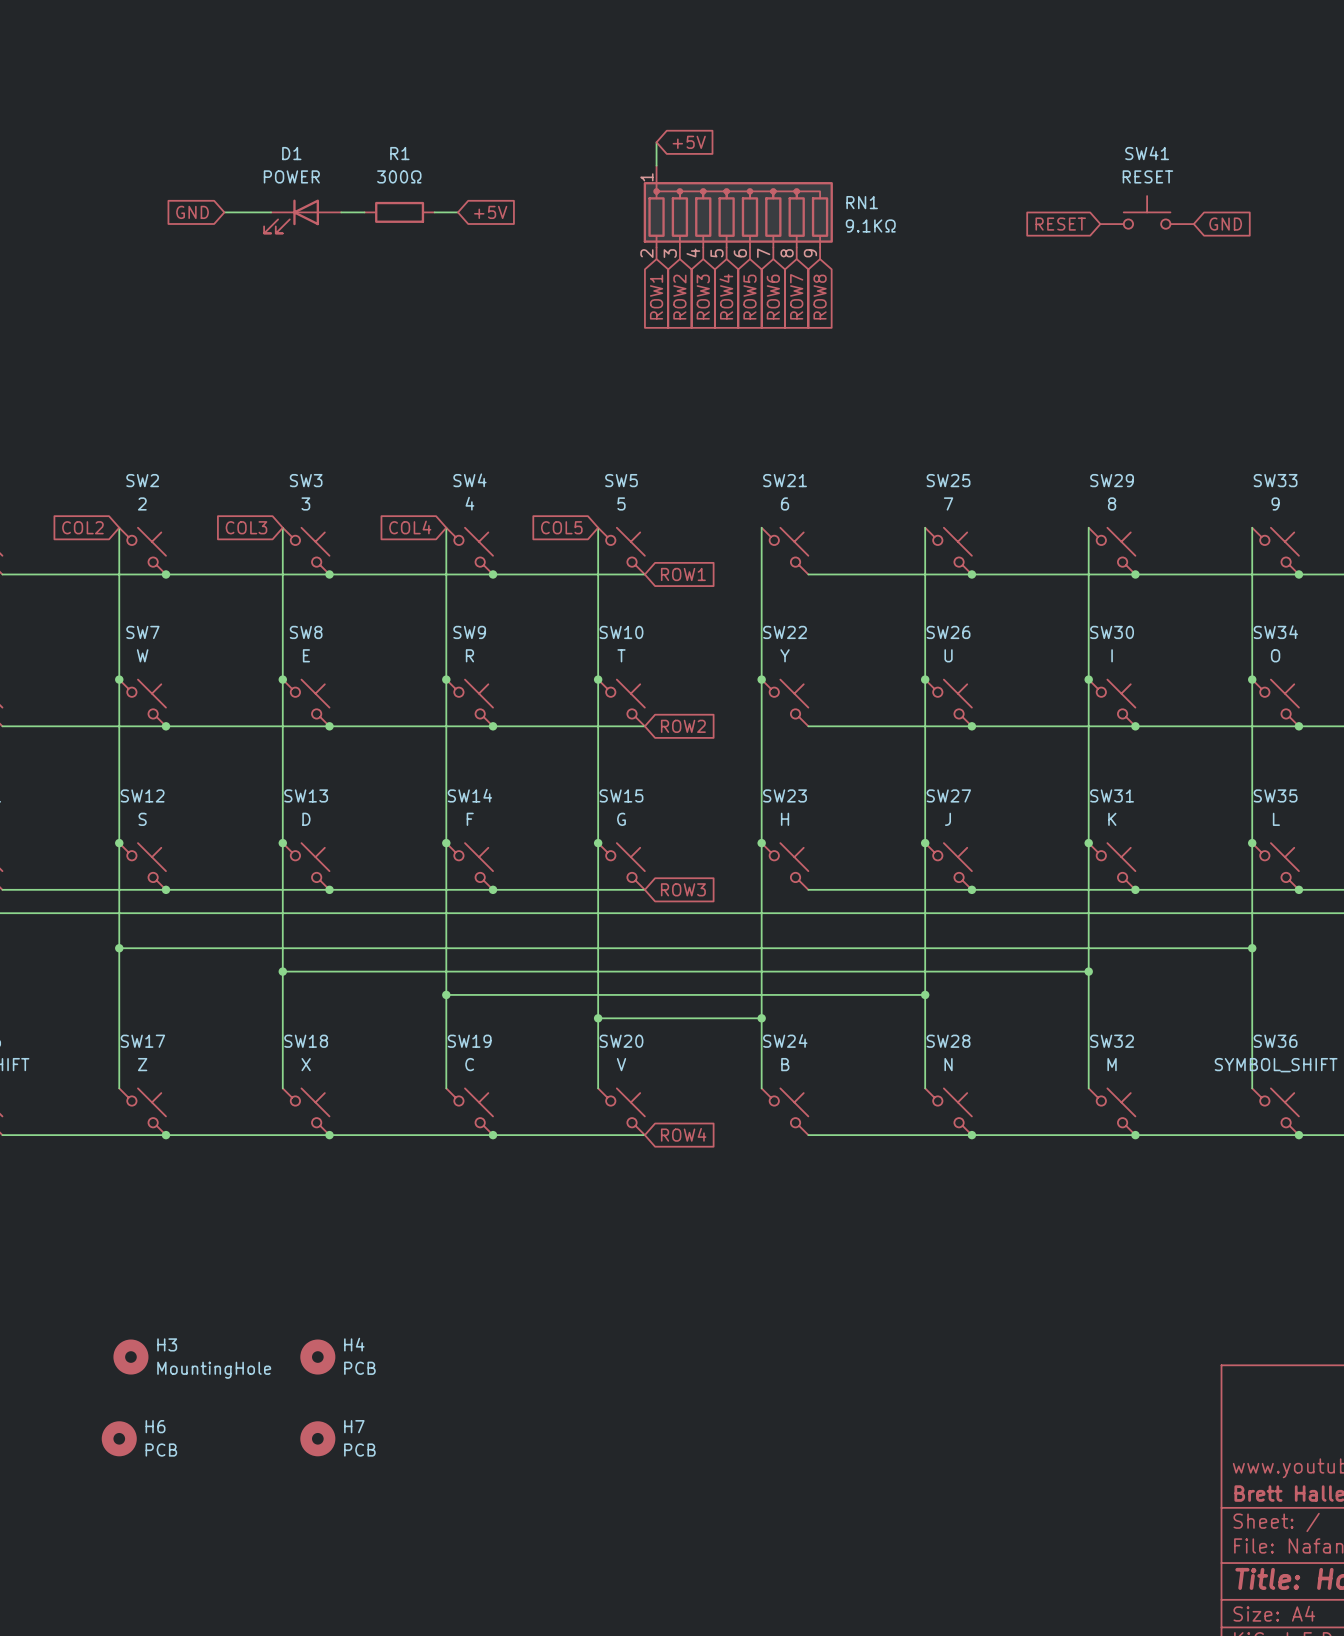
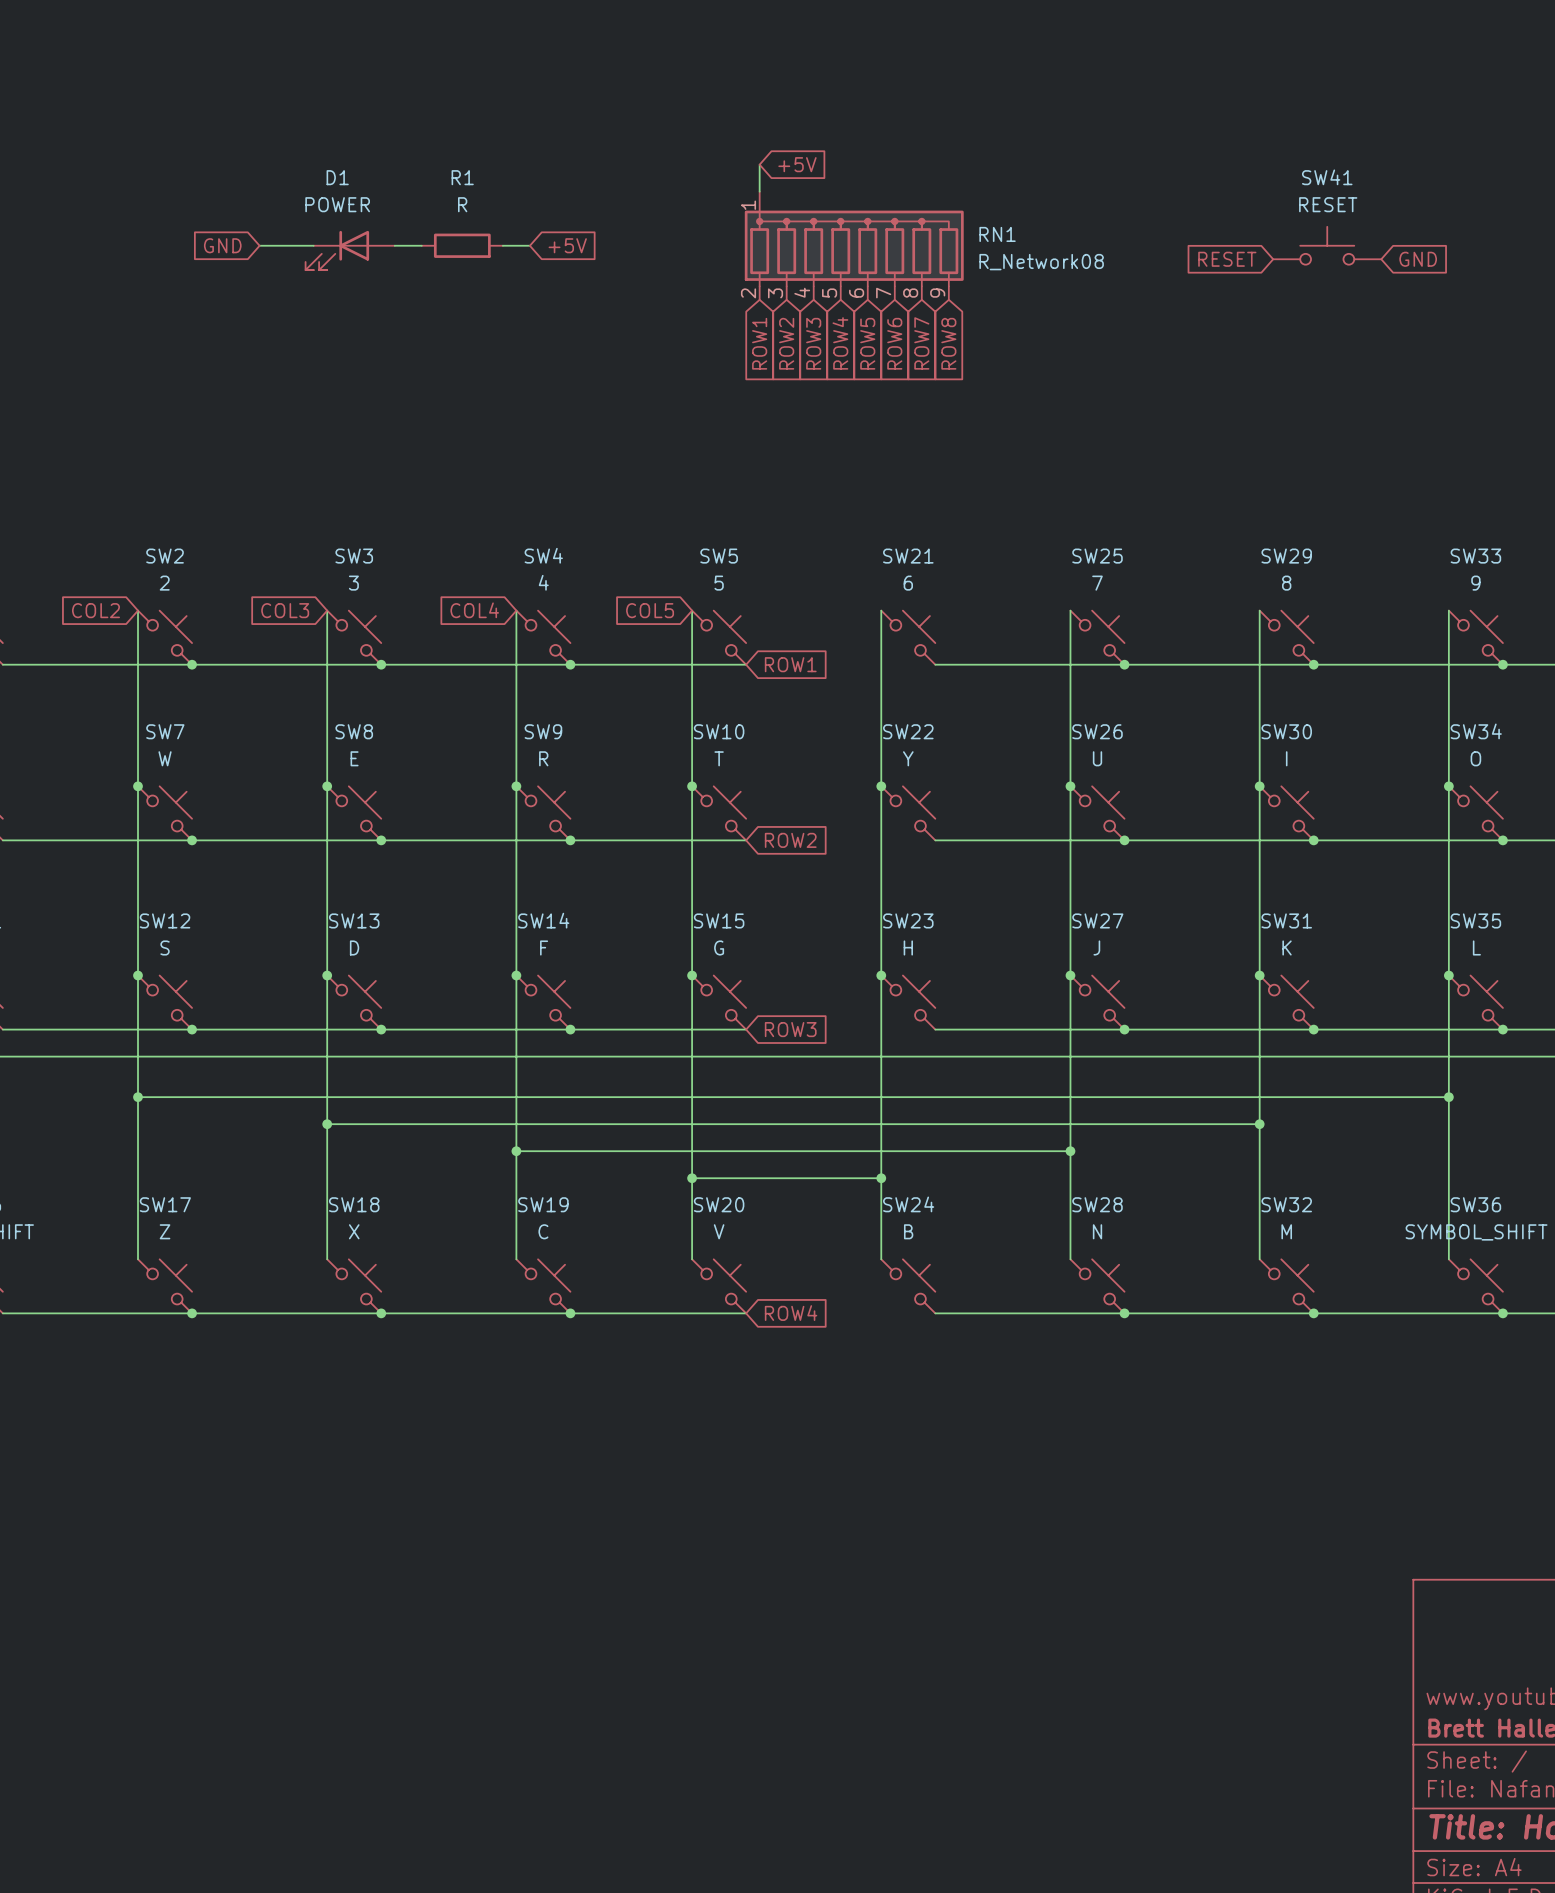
R1 value: 300Ω (399, 176) -> R (462, 204)
RN1 value: 9.1KΩ (870, 225) -> R_Network08 (1041, 262)
H3: MountingHole (130, 1357) -> none
H4: PCB (317, 1357) -> none
H6: PCB (119, 1438) -> none
H7: PCB (317, 1438) -> none

